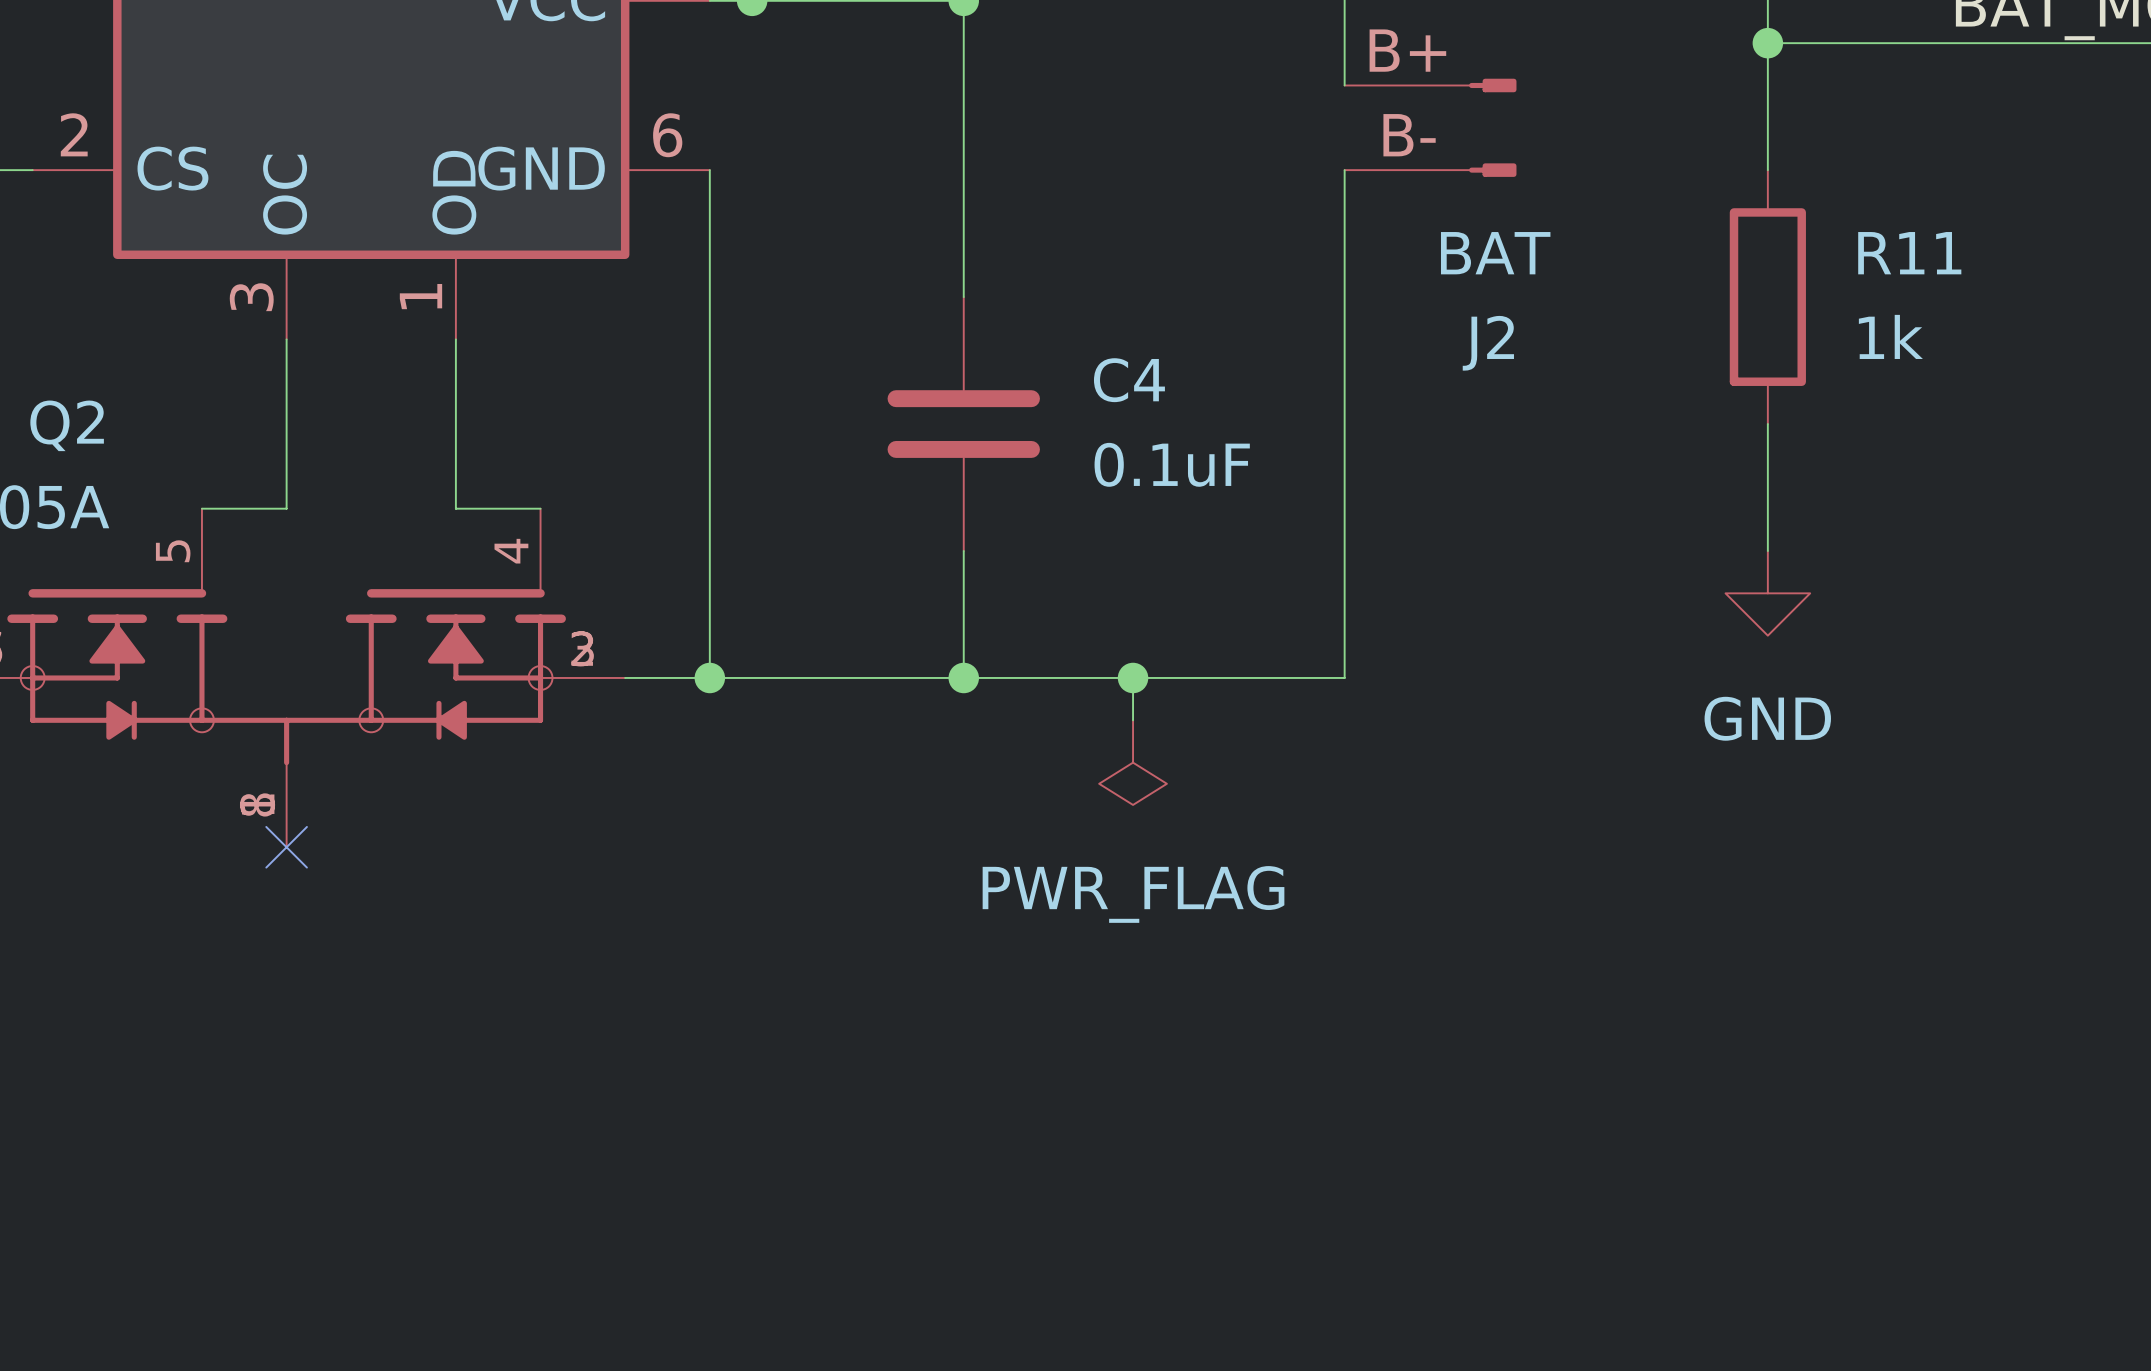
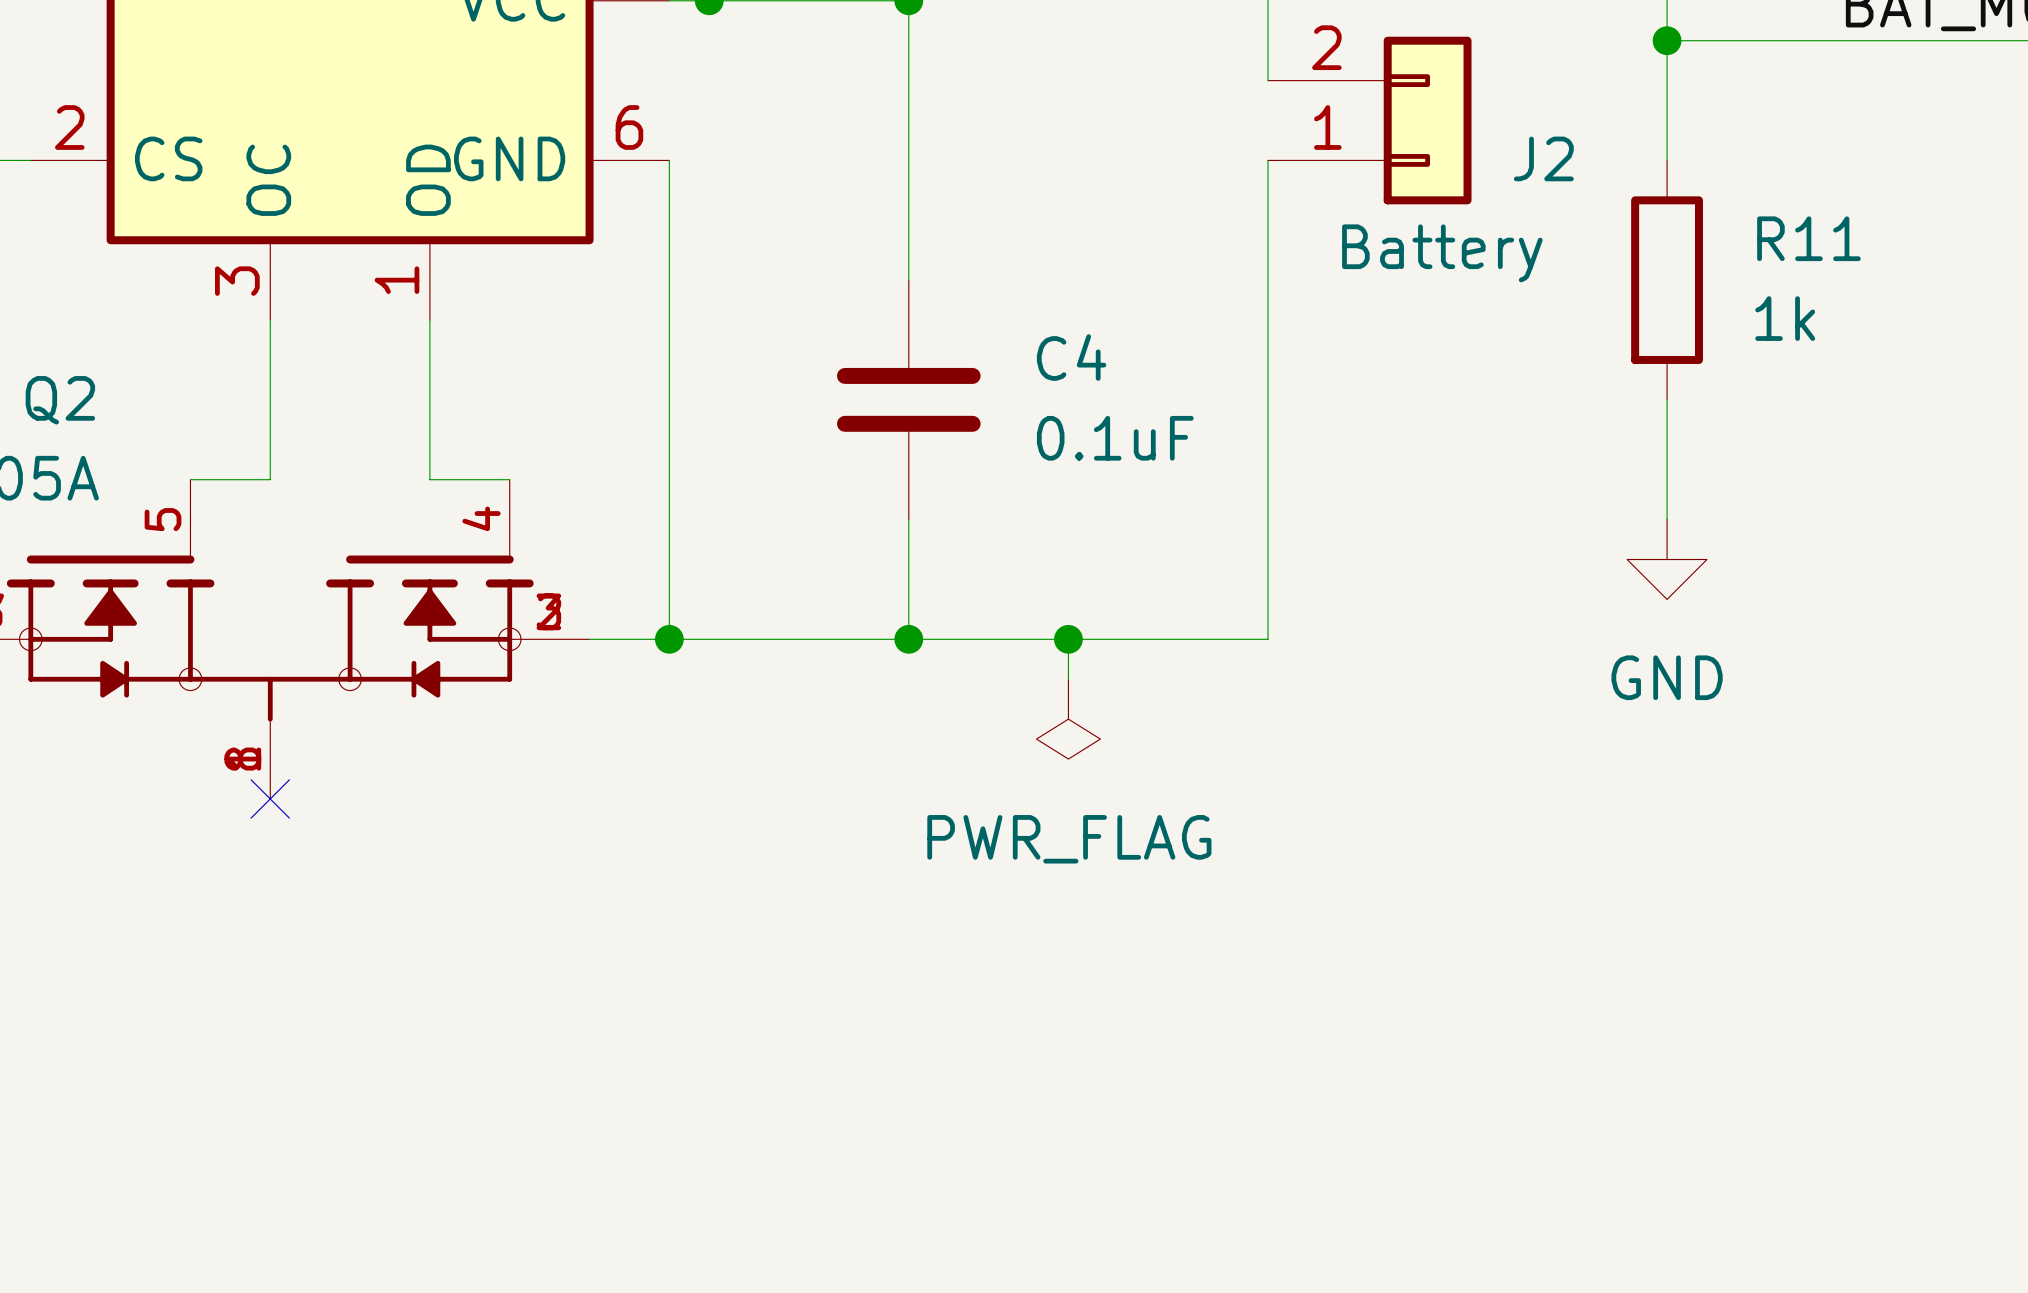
J2 symbol: [1344, 78, 1517, 177] -> [1267, 36, 1472, 205]
J2 value: BAT (1495, 253) -> Battery (1442, 253)
J2 name position: J2 (1488, 343) -> J2 (1543, 158)

